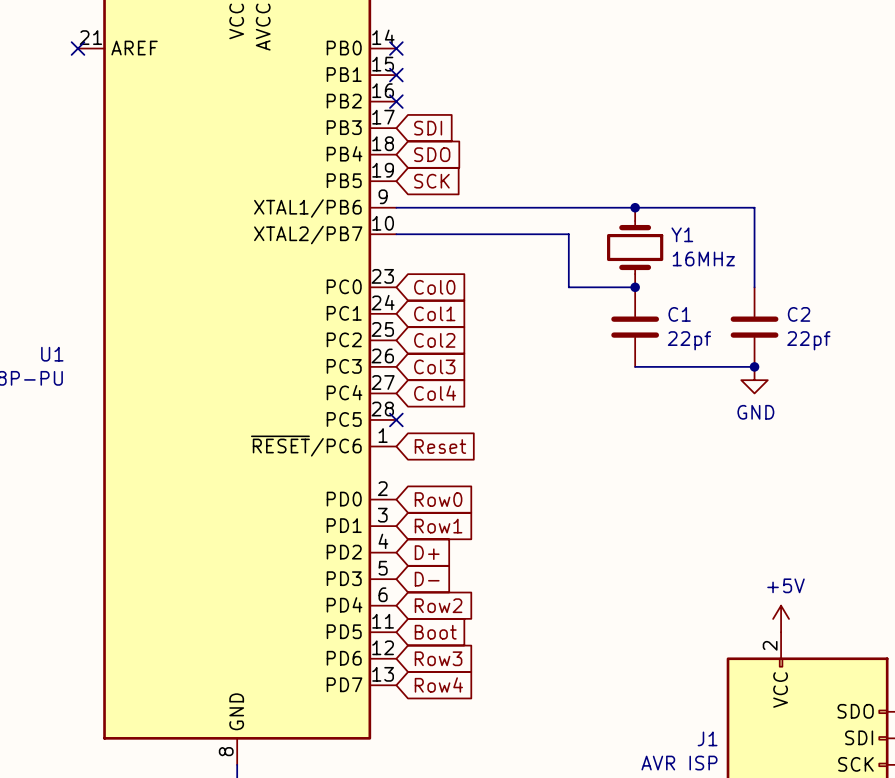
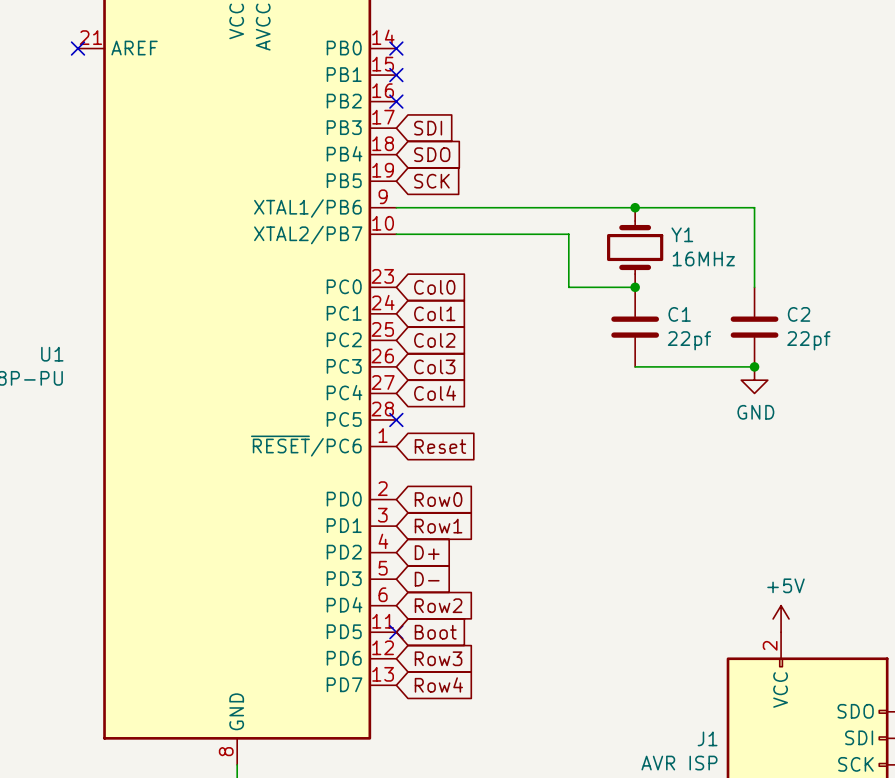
no-connect mark: none -> (396, 632)

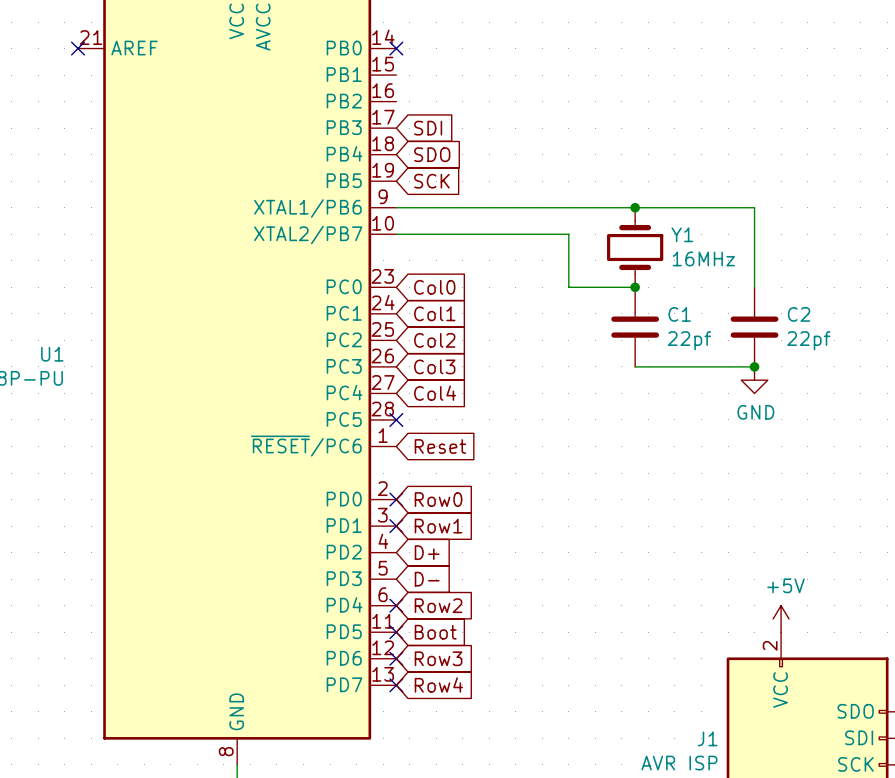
no-connect mark: (396, 75) -> none
no-connect mark: (396, 101) -> none
no-connect mark: none -> (396, 499)
no-connect mark: none -> (396, 526)
no-connect mark: none -> (396, 605)
no-connect mark: none -> (396, 658)
no-connect mark: none -> (396, 685)

